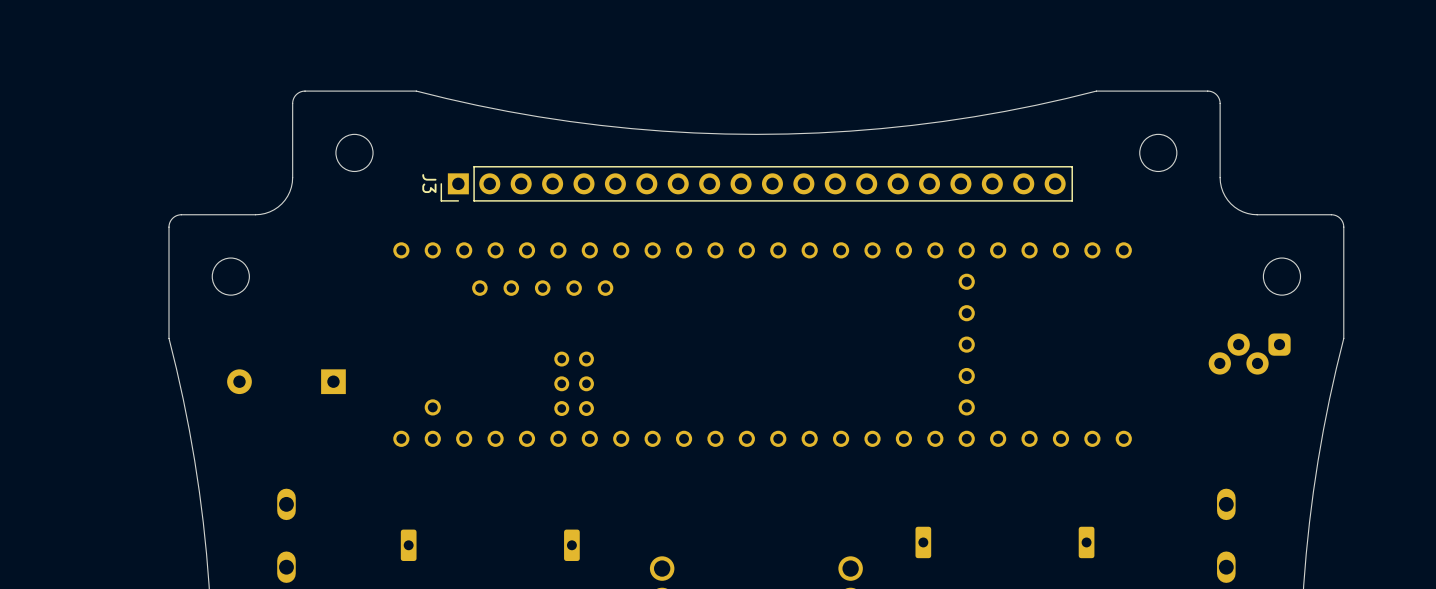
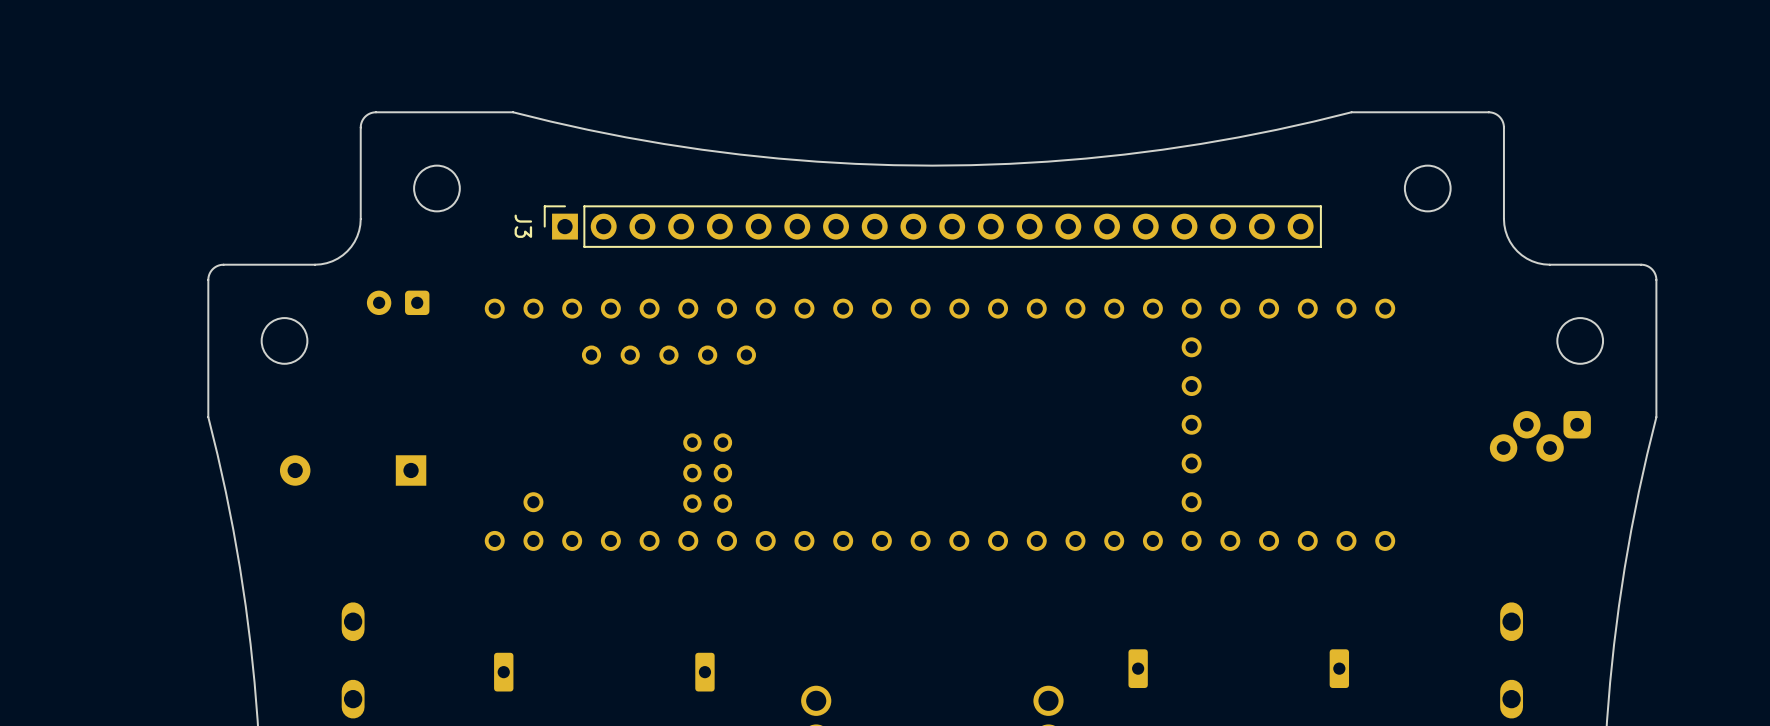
J3 footprint: [440, 166, 1073, 202] -> [543, 205, 1322, 248]
part: none -> (398, 302)

